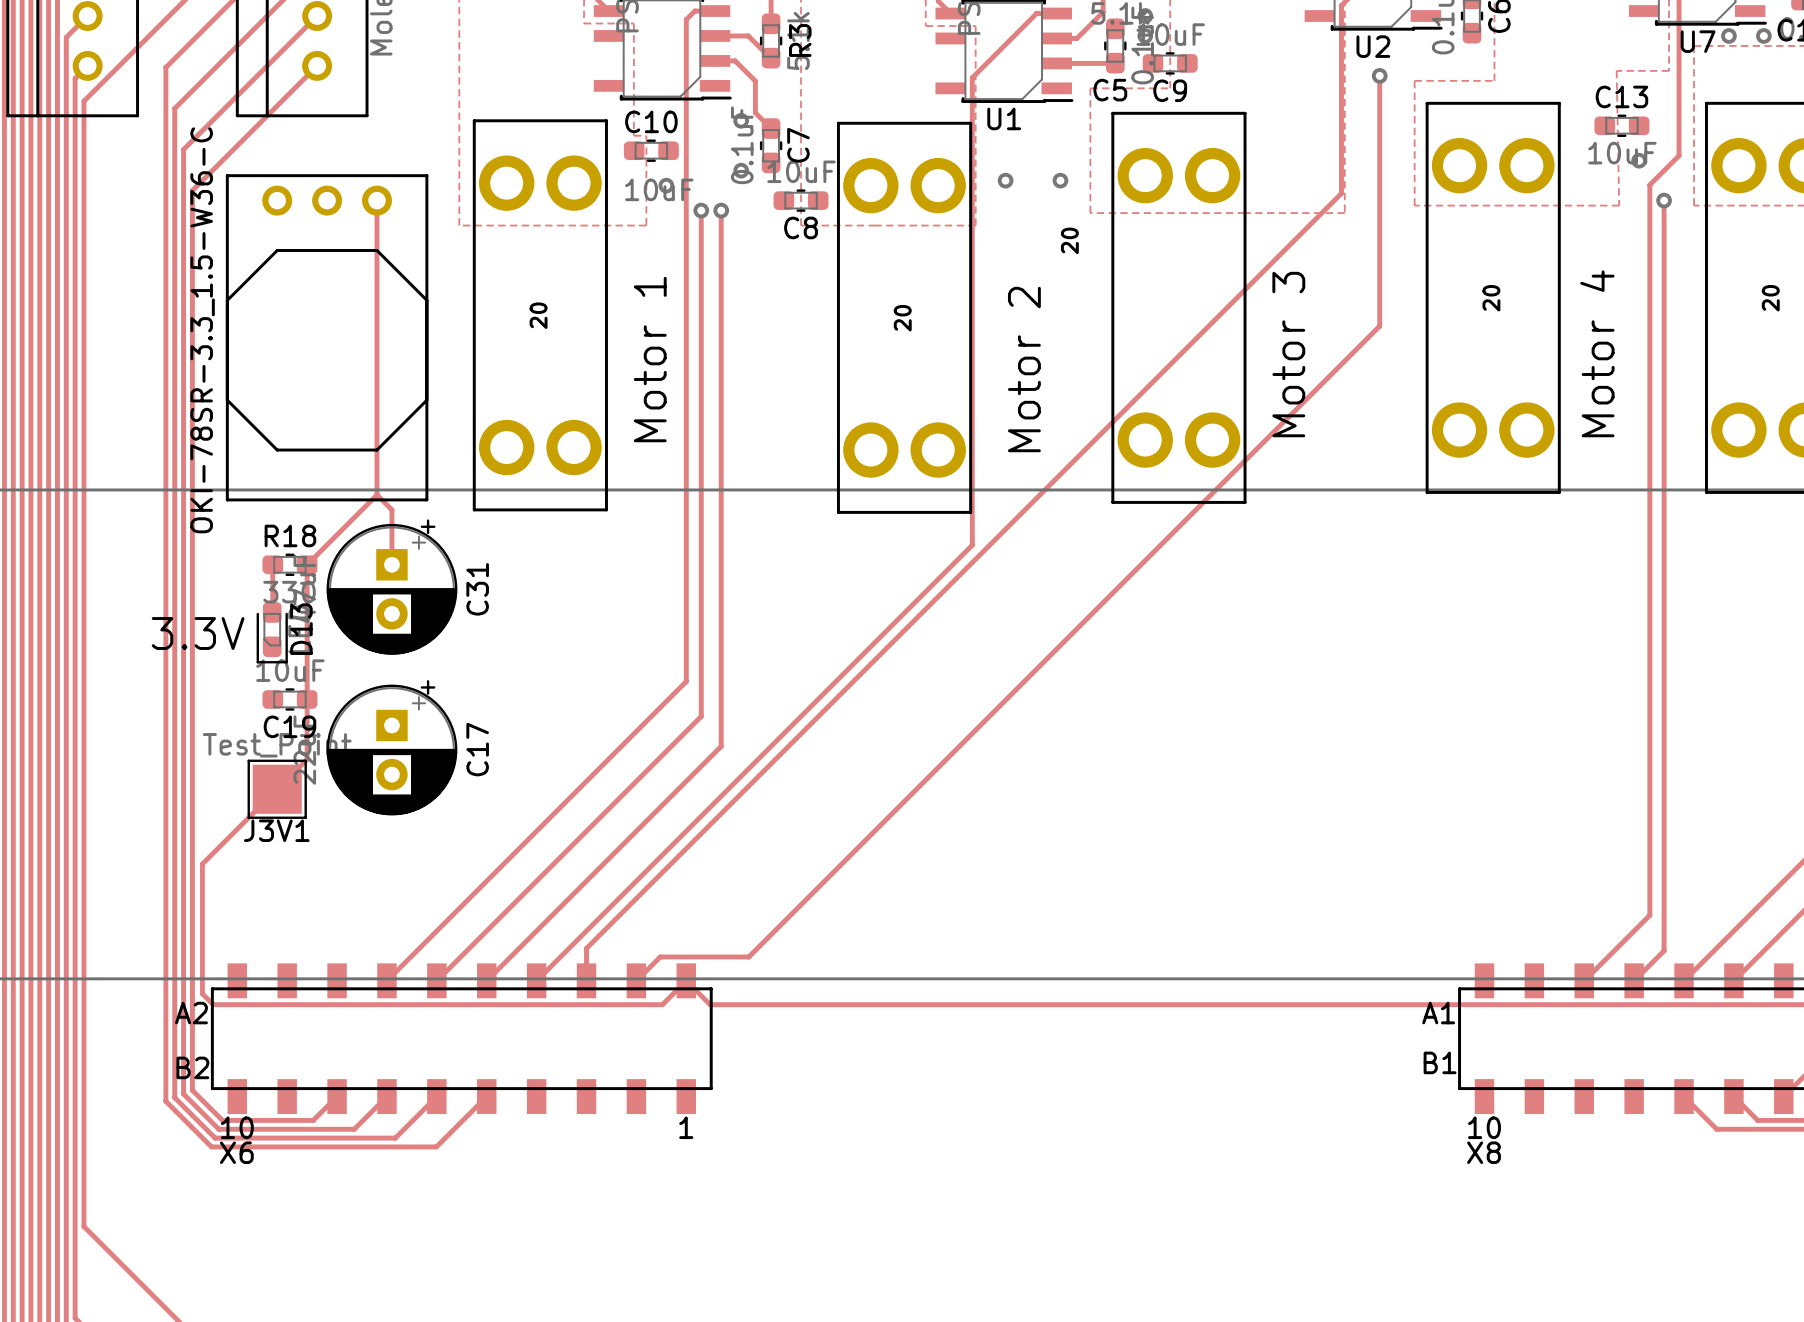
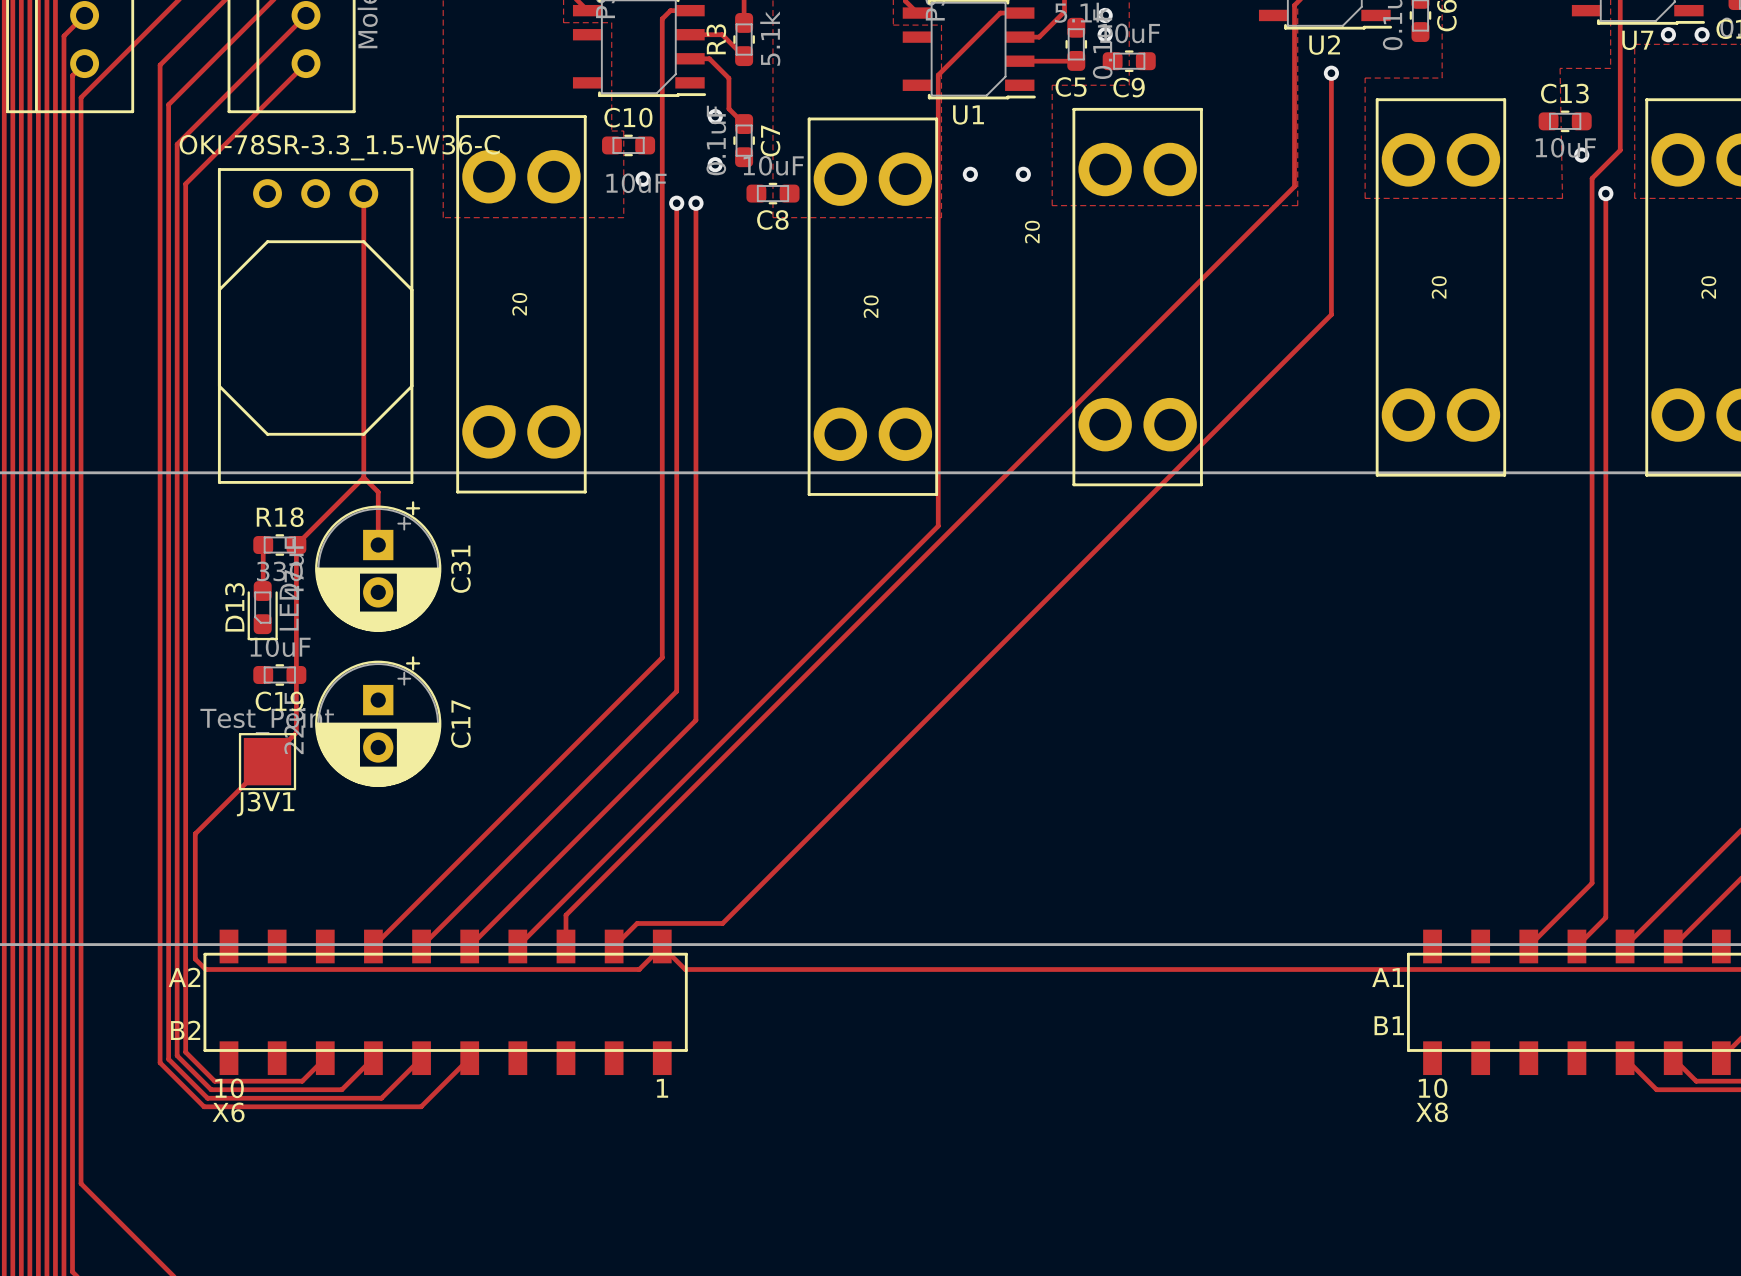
R3 name position: R3 (800, 40) -> R3 (716, 39)
part value rotation: 0° (202, 330) -> 90° clockwise (339, 147)
text: Motor 4 (1597, 353) -> none
text: Motor 3 (1288, 354) -> none
text: Motor 1 (650, 359) -> none
text: Motor 2 (1024, 369) -> none
D13 name position: D13 (301, 629) -> D13 (234, 607)
text: 3.3V (198, 633) -> none

